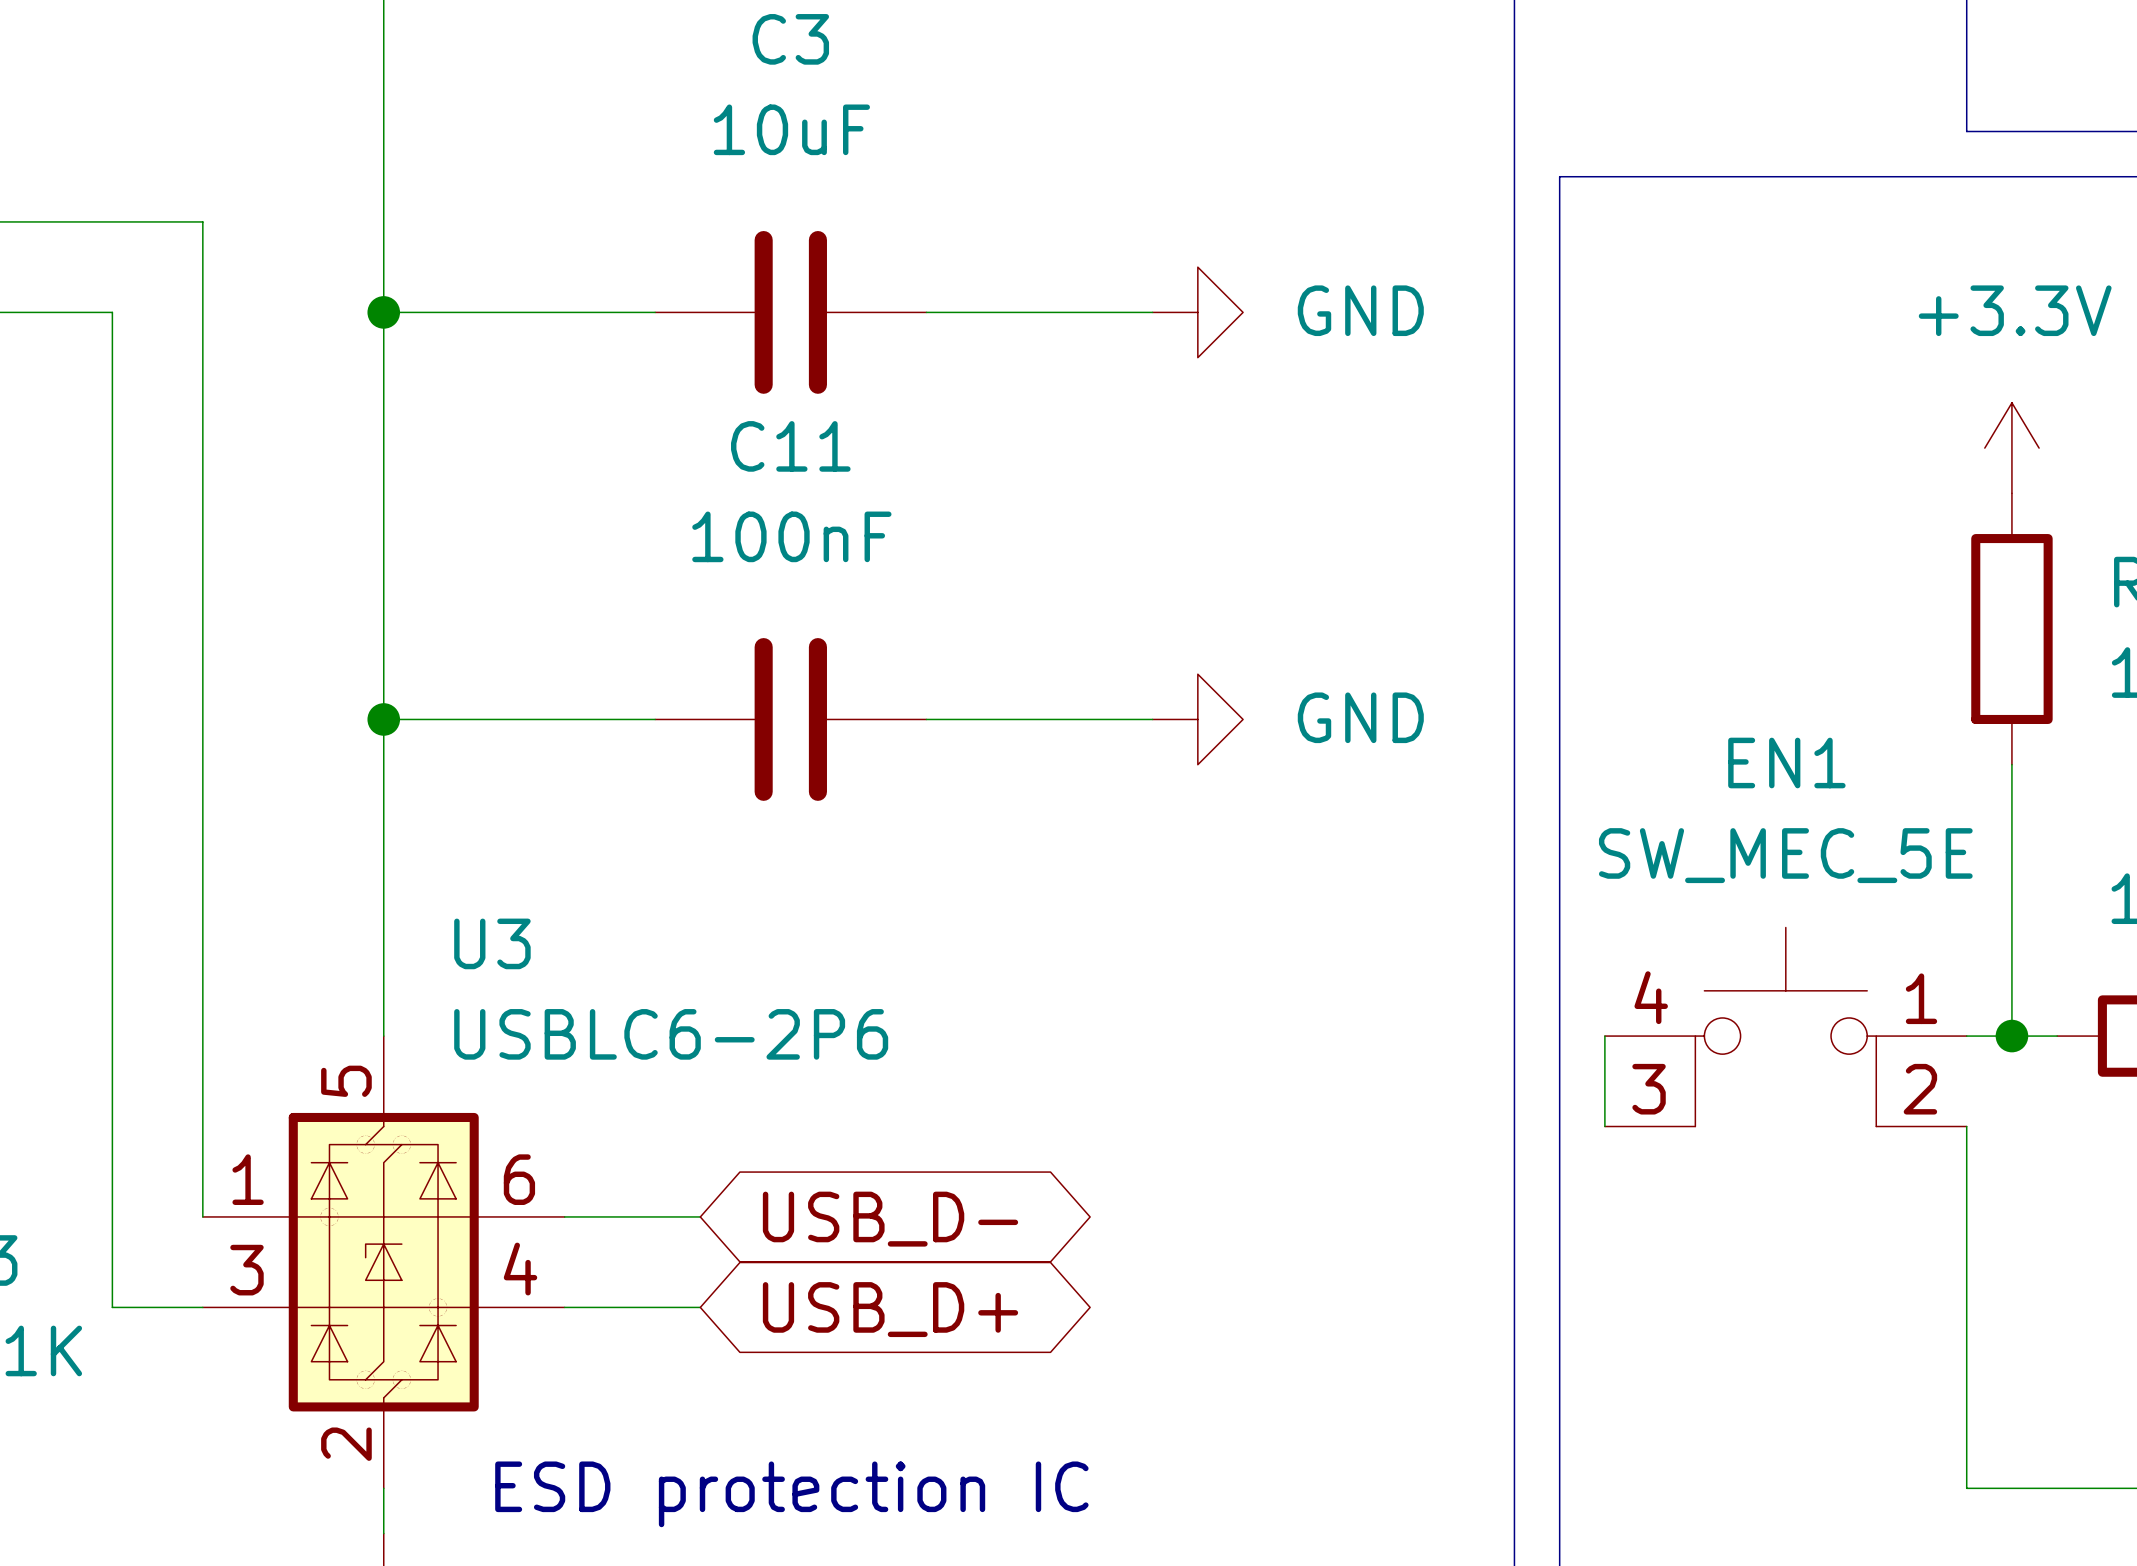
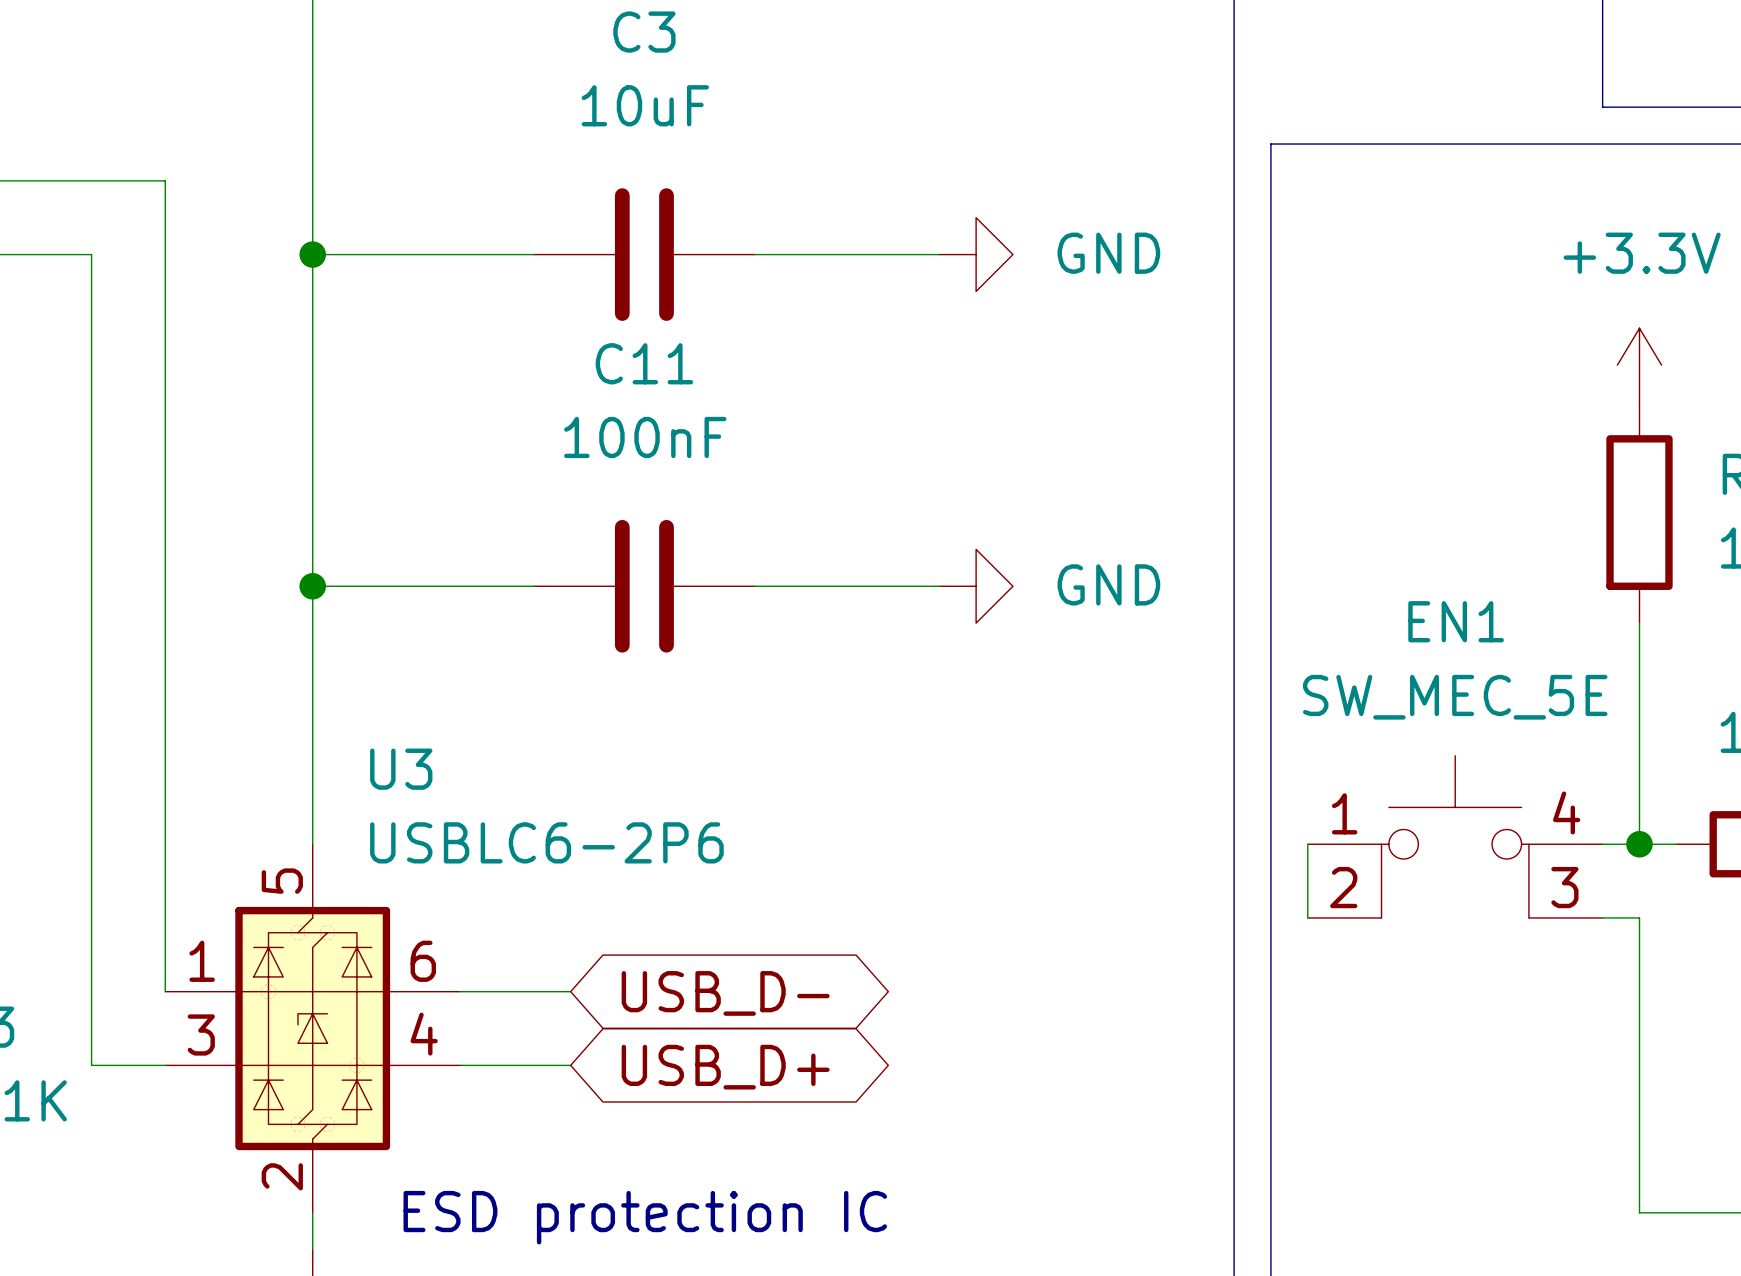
EN1 flip: as is (1785, 1027) -> left-right (1455, 836)
wire: (1966, 1126) (1966, 1488) (2011, 1488) -> (1602, 917) (1639, 917) (1639, 1212)

